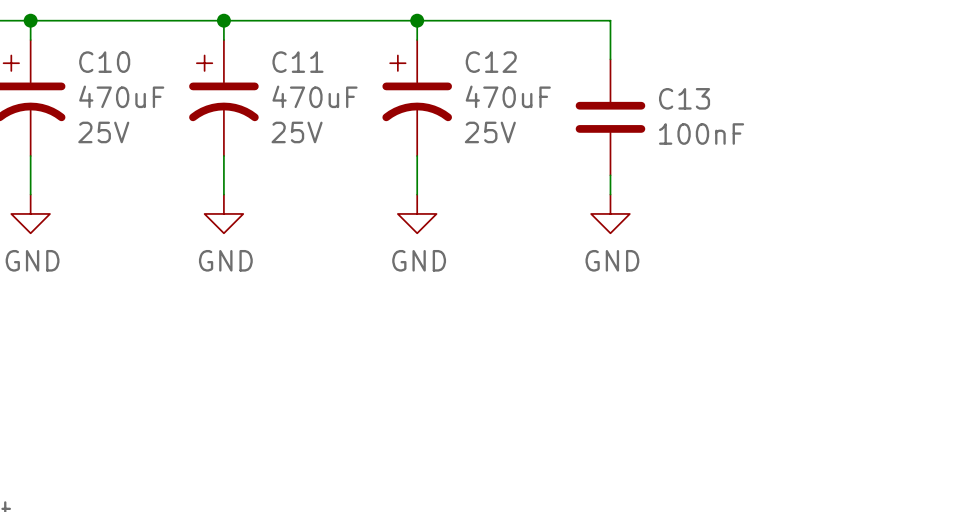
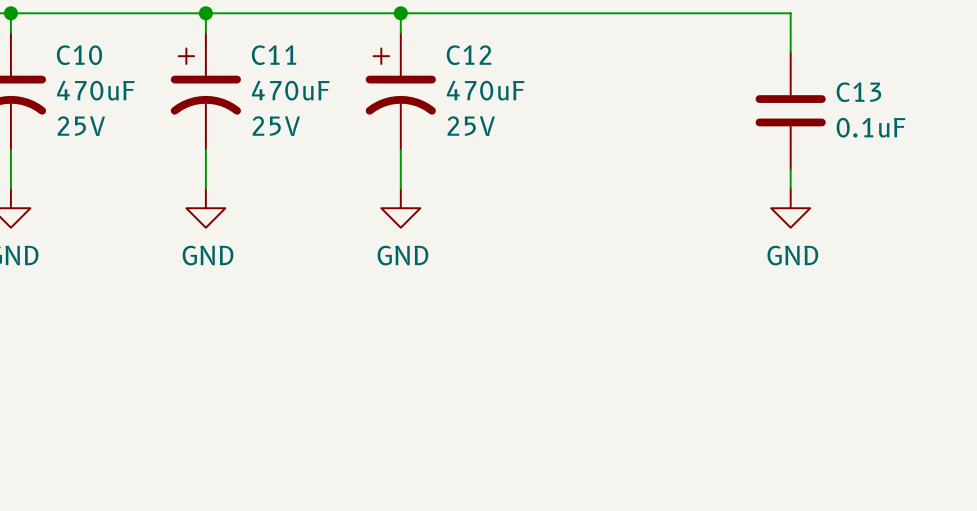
wire: (610, 20) (610, 59) -> (595, 13) (790, 13) (790, 52)
C13 position: (610, 117) -> (790, 110)
C13 value: 100nF (701, 134) -> 0.1uF (871, 127)
wire: (610, 175) (610, 194) -> (790, 169) (790, 188)
power symbol position: GND (610, 213) -> GND (790, 208)

